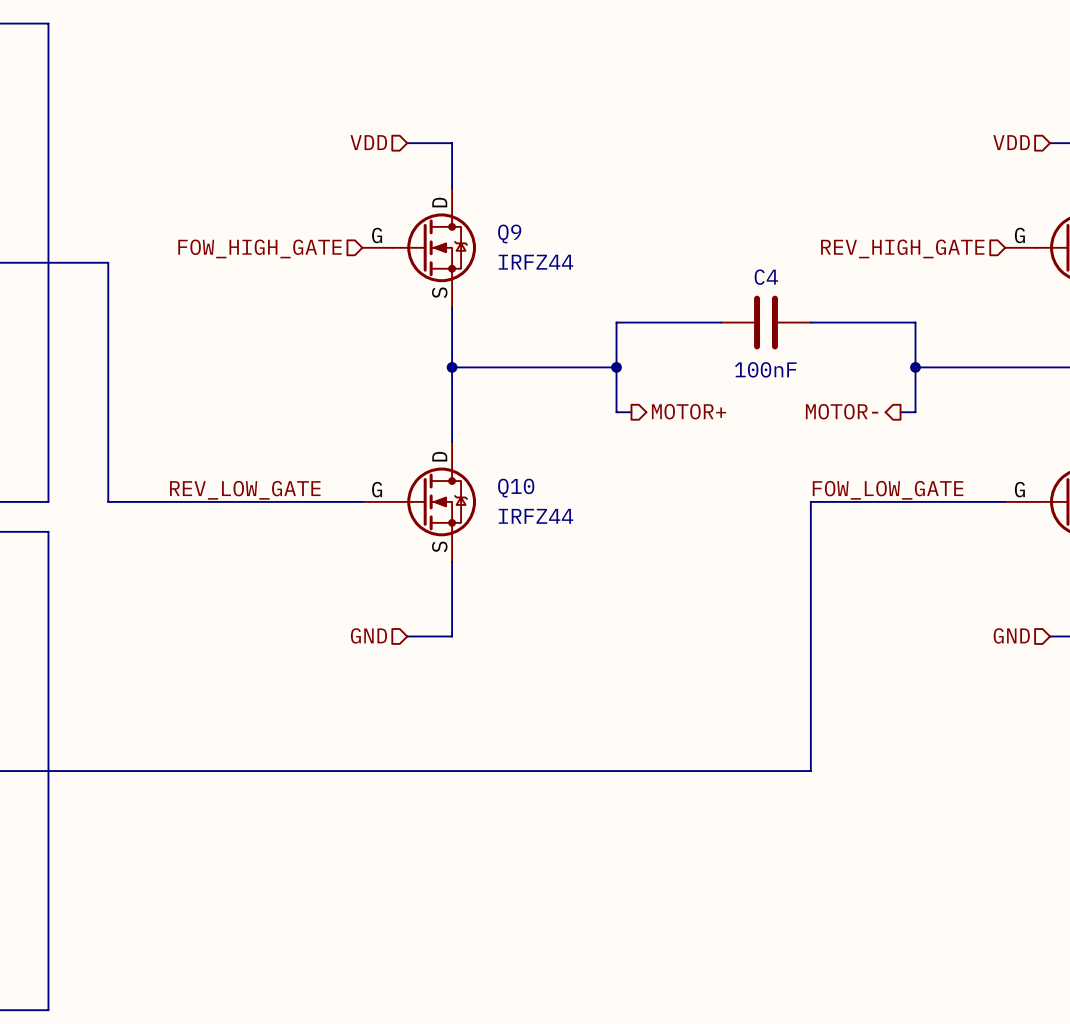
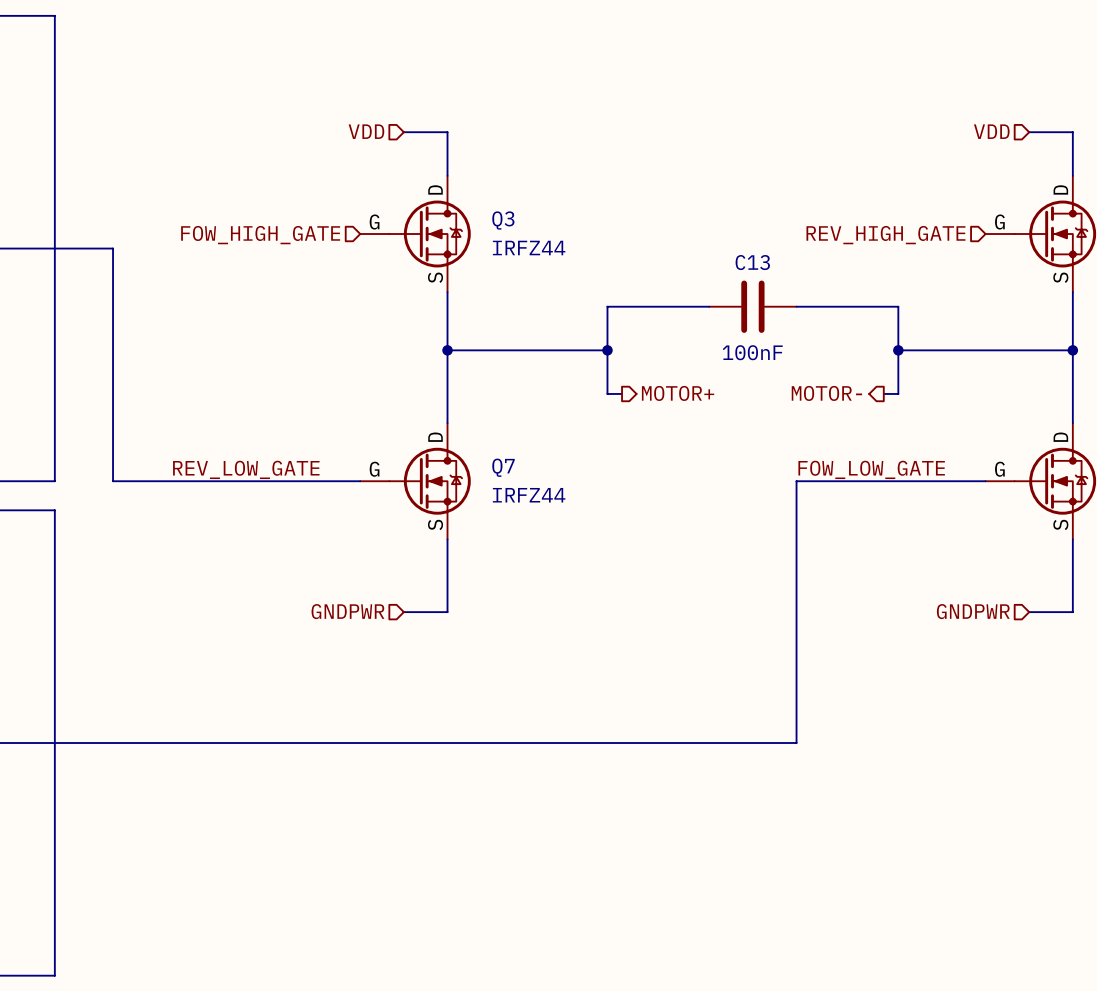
Q9 name: Q9 (509, 233) -> Q3 (503, 220)
C4 name: C4 (766, 277) -> C13 (752, 262)
Q10 name: Q10 (516, 488) -> Q7 (503, 467)
hierarchical label: GND (368, 635) -> GNDPWR (347, 611)
hierarchical label: GND (1011, 635) -> GNDPWR (973, 611)

